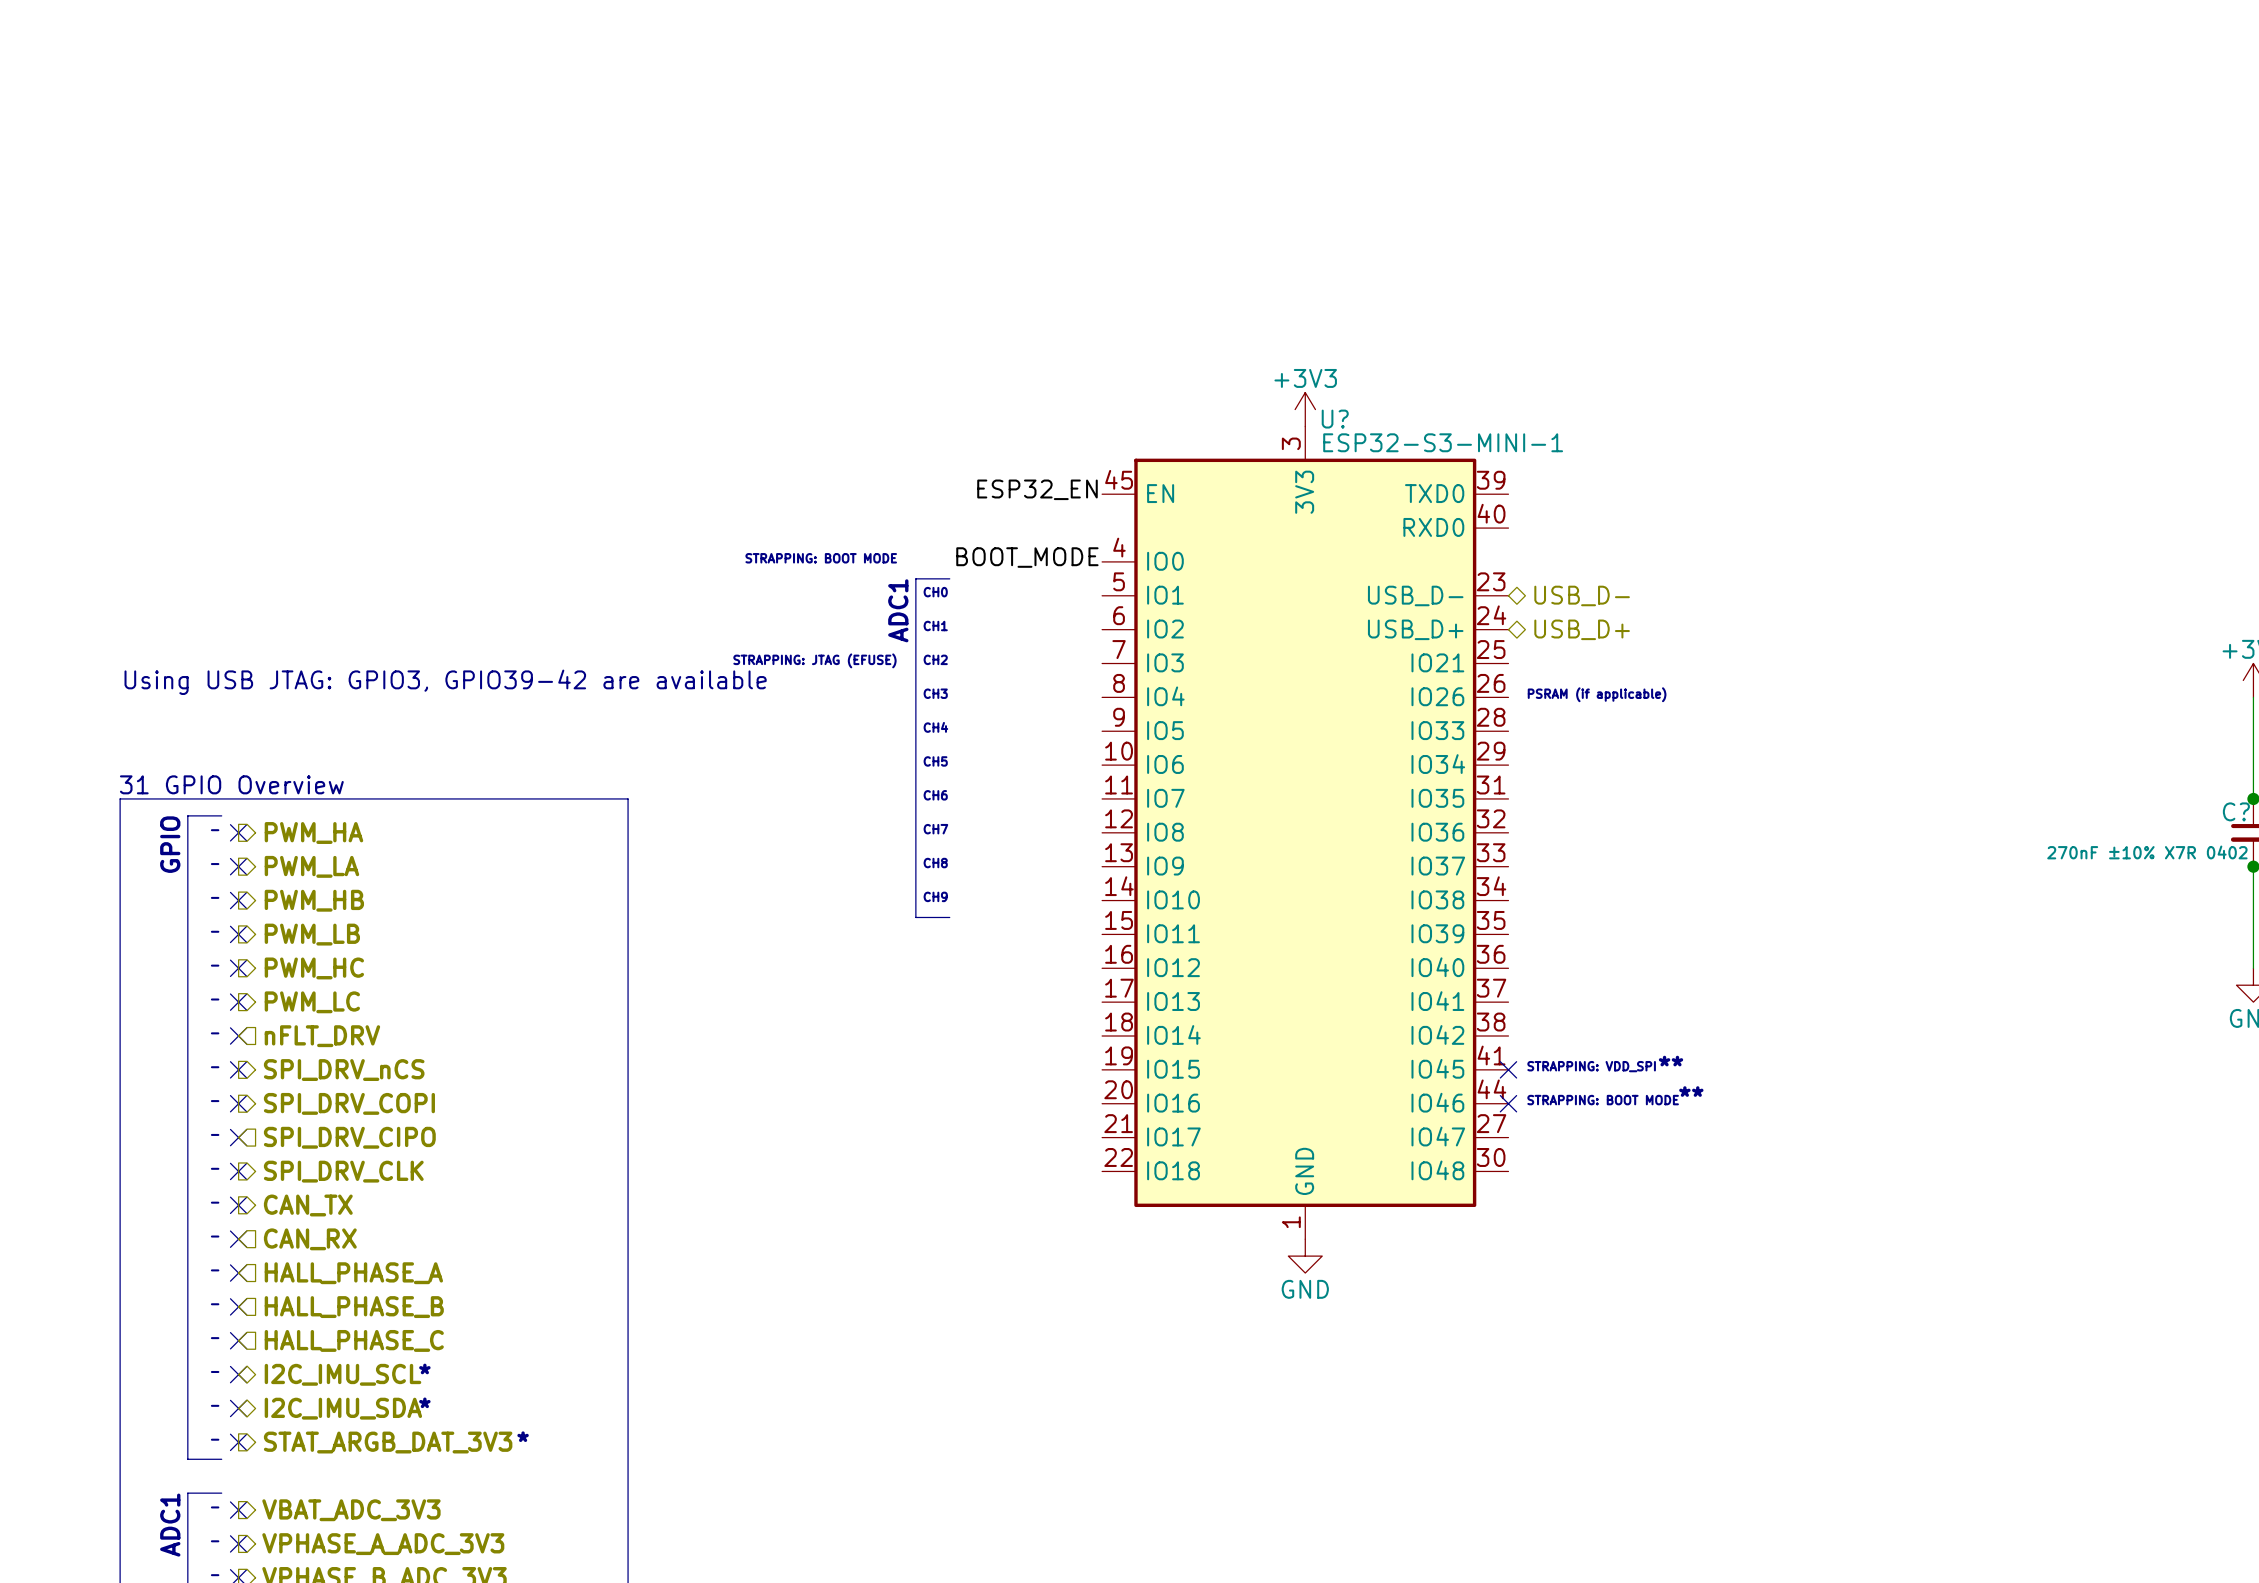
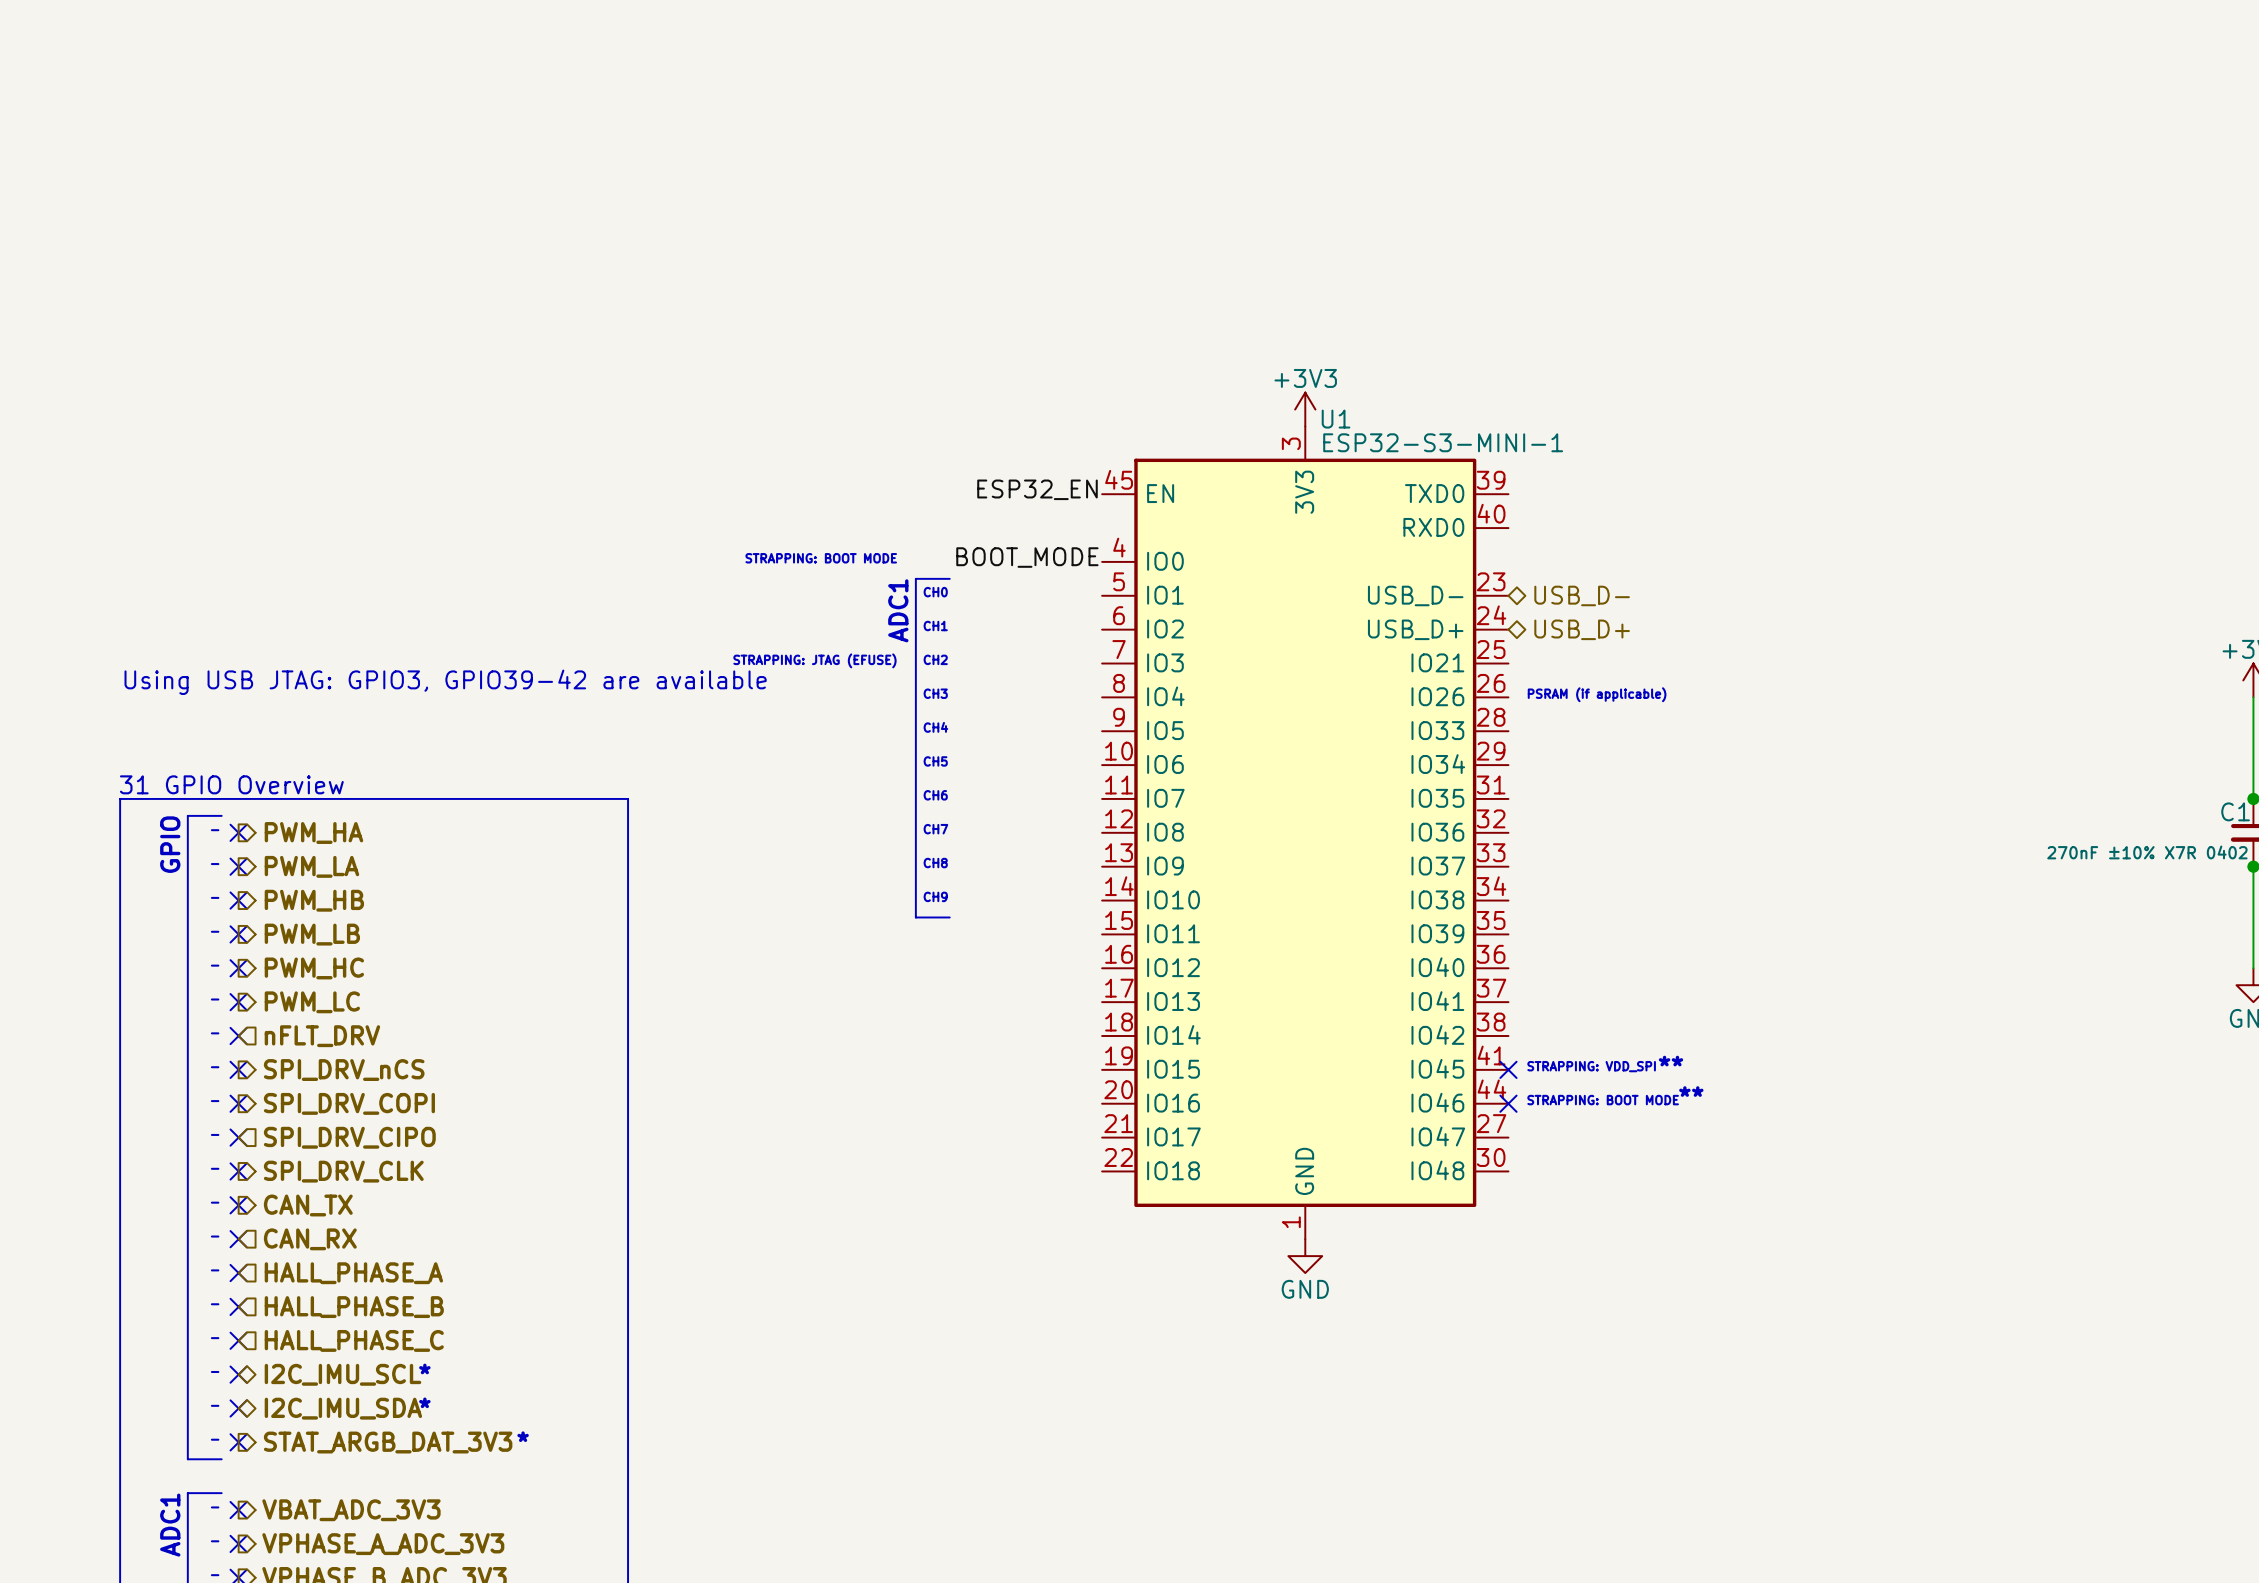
U? name: U? (1335, 419) -> U1 (1336, 419)
C? name: C? (2236, 811) -> C1 (2235, 811)

